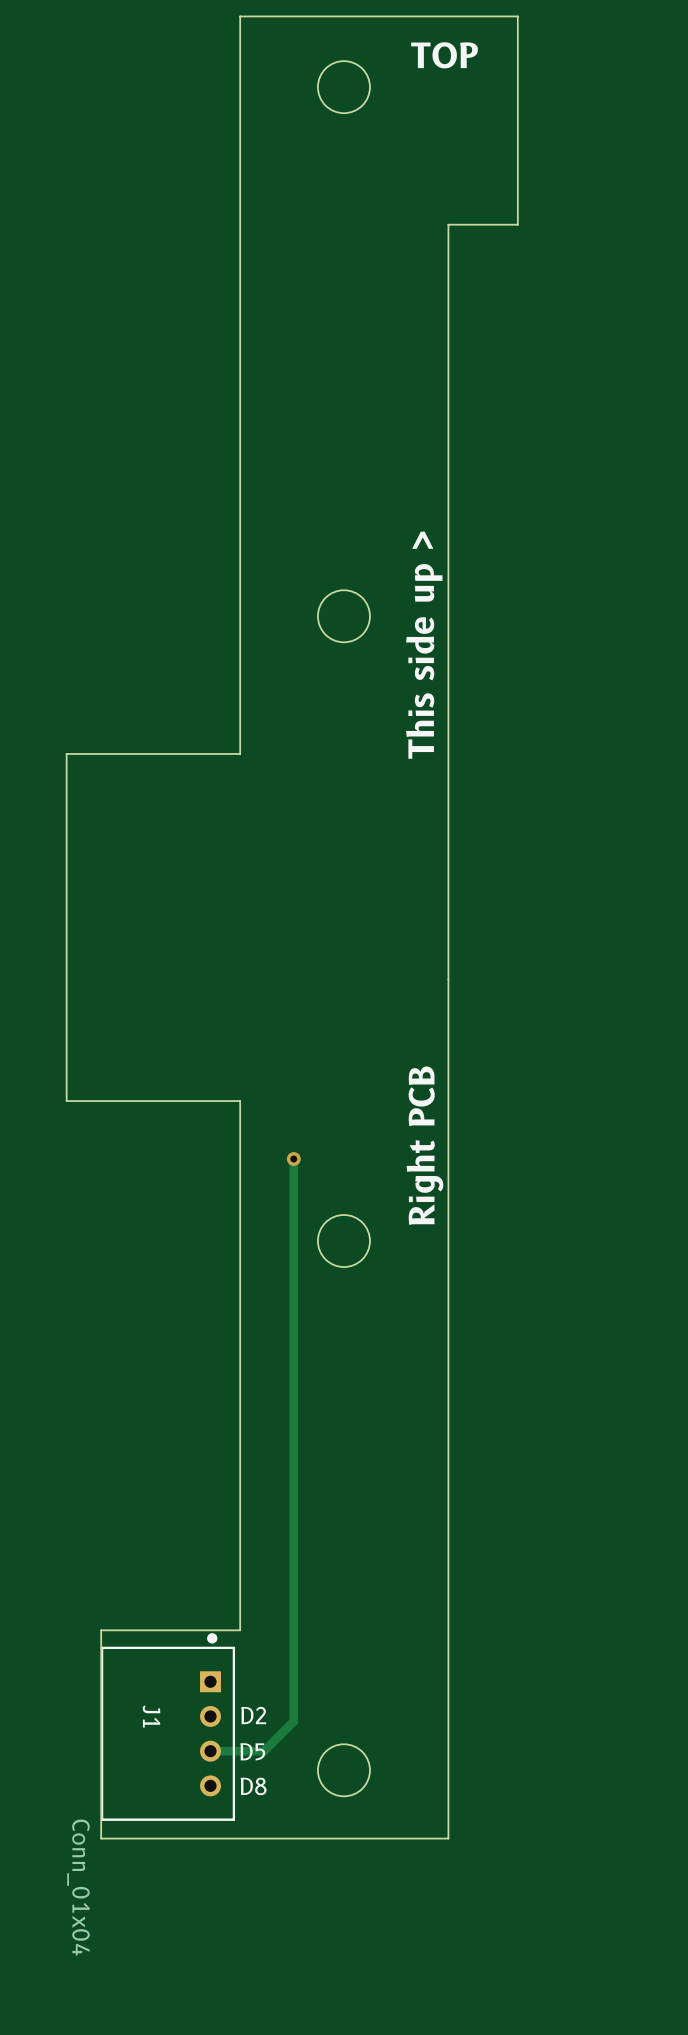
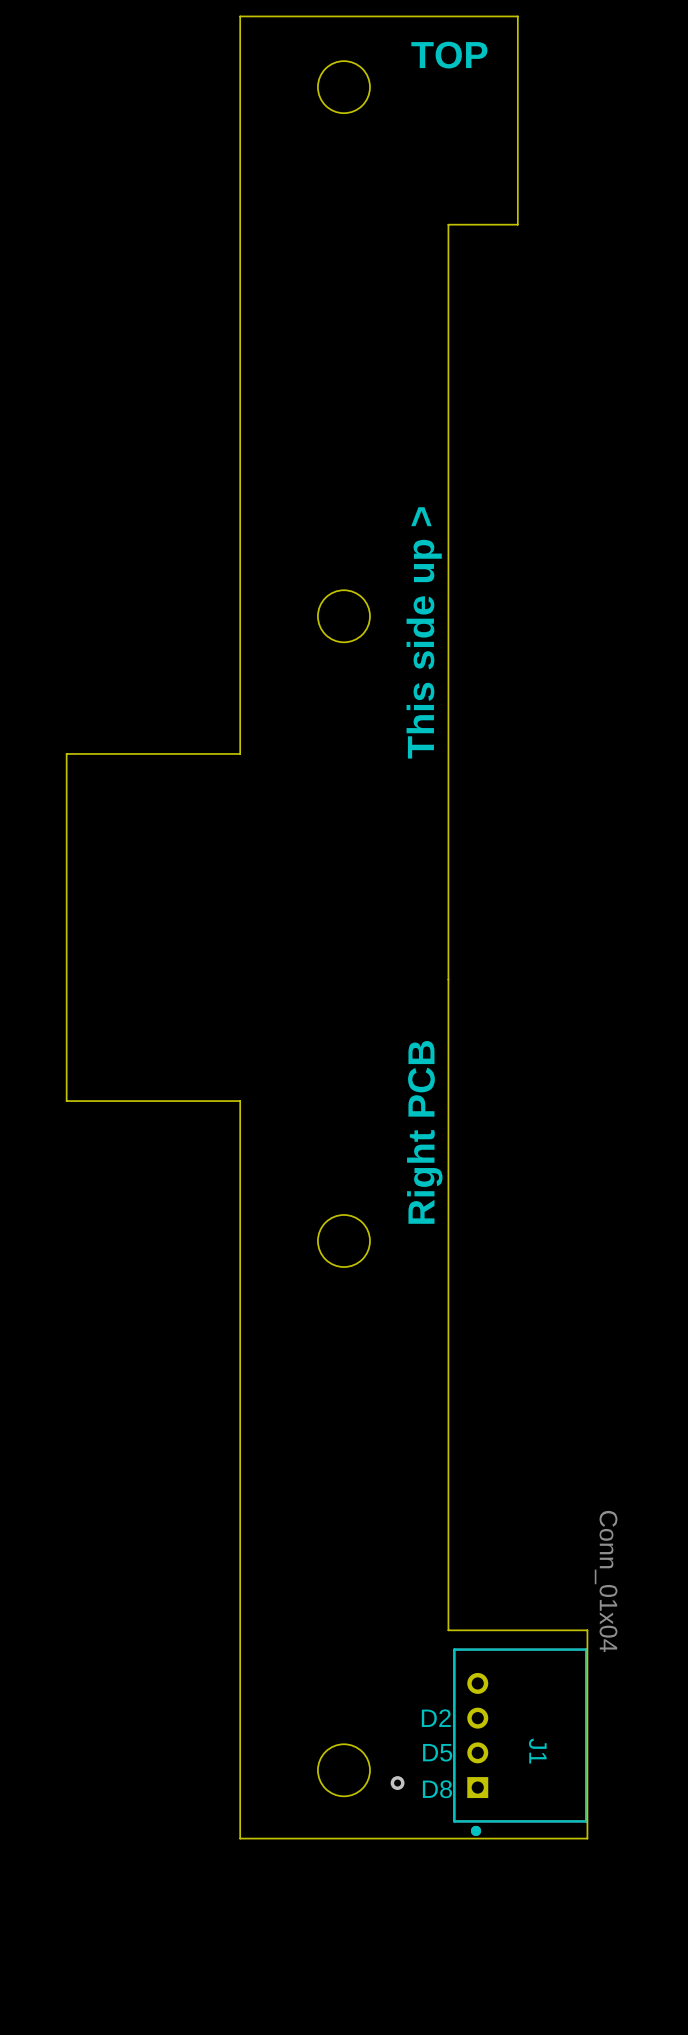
track: (293, 1159) (293, 1721) (264, 1751) (210, 1751) -> none
via: (293, 1159) -> none
board edge: (240, 1630) (101, 1630) (101, 1838) (240, 1838) -> (240, 1630) (240, 1838)
board edge: (448, 1630) (448, 1838) -> (448, 1630) (587, 1630) (587, 1838) (448, 1838)
text position: D2 (253, 1715) -> D2 (436, 1718)
J1 rotation: 0° (167, 1727) -> 180° (520, 1742)
J1 position: (167, 1727) -> (520, 1742)
text position: D5 (252, 1751) -> D5 (437, 1752)
via: none -> (397, 1783)
text position: D8 (253, 1786) -> D8 (437, 1789)

